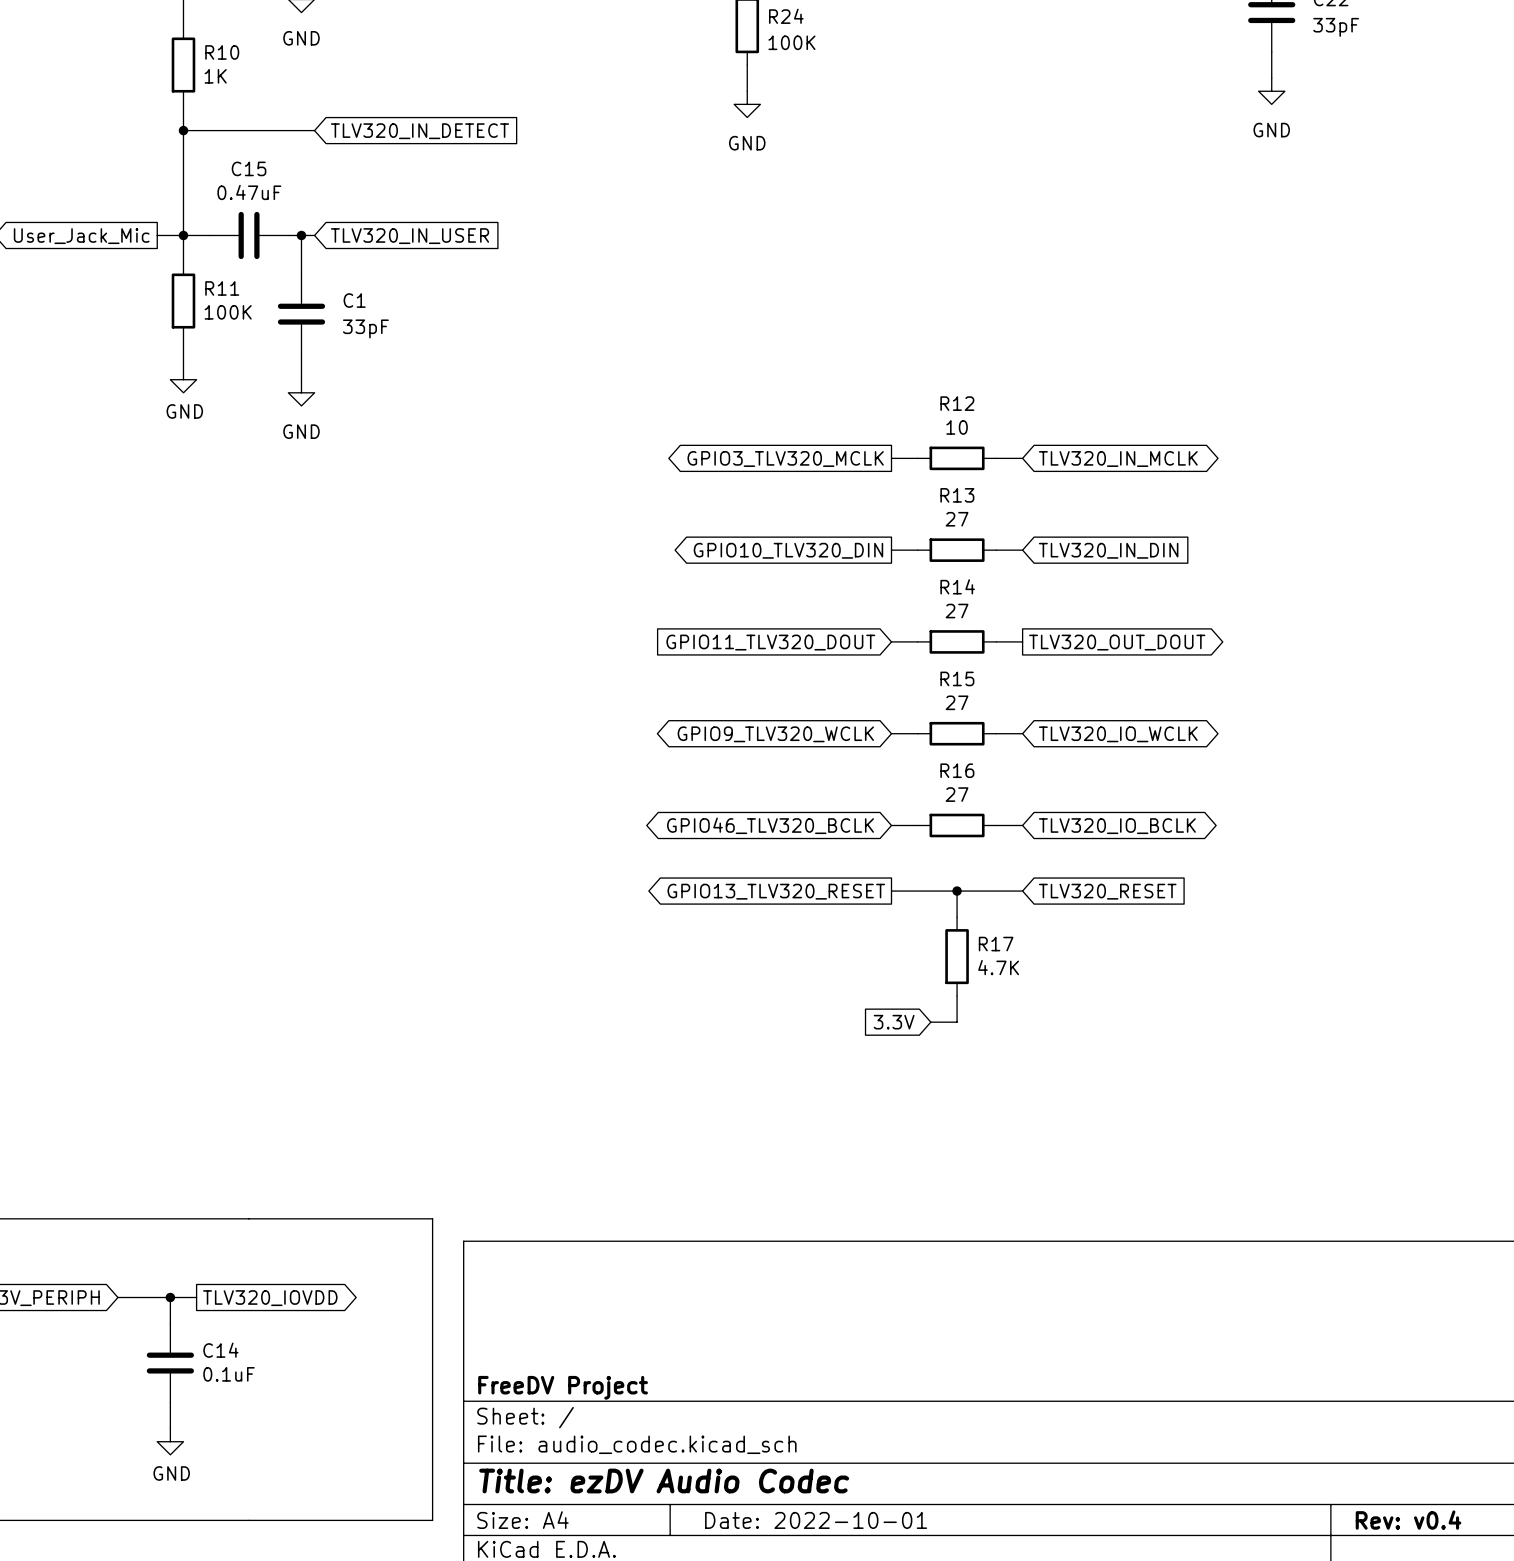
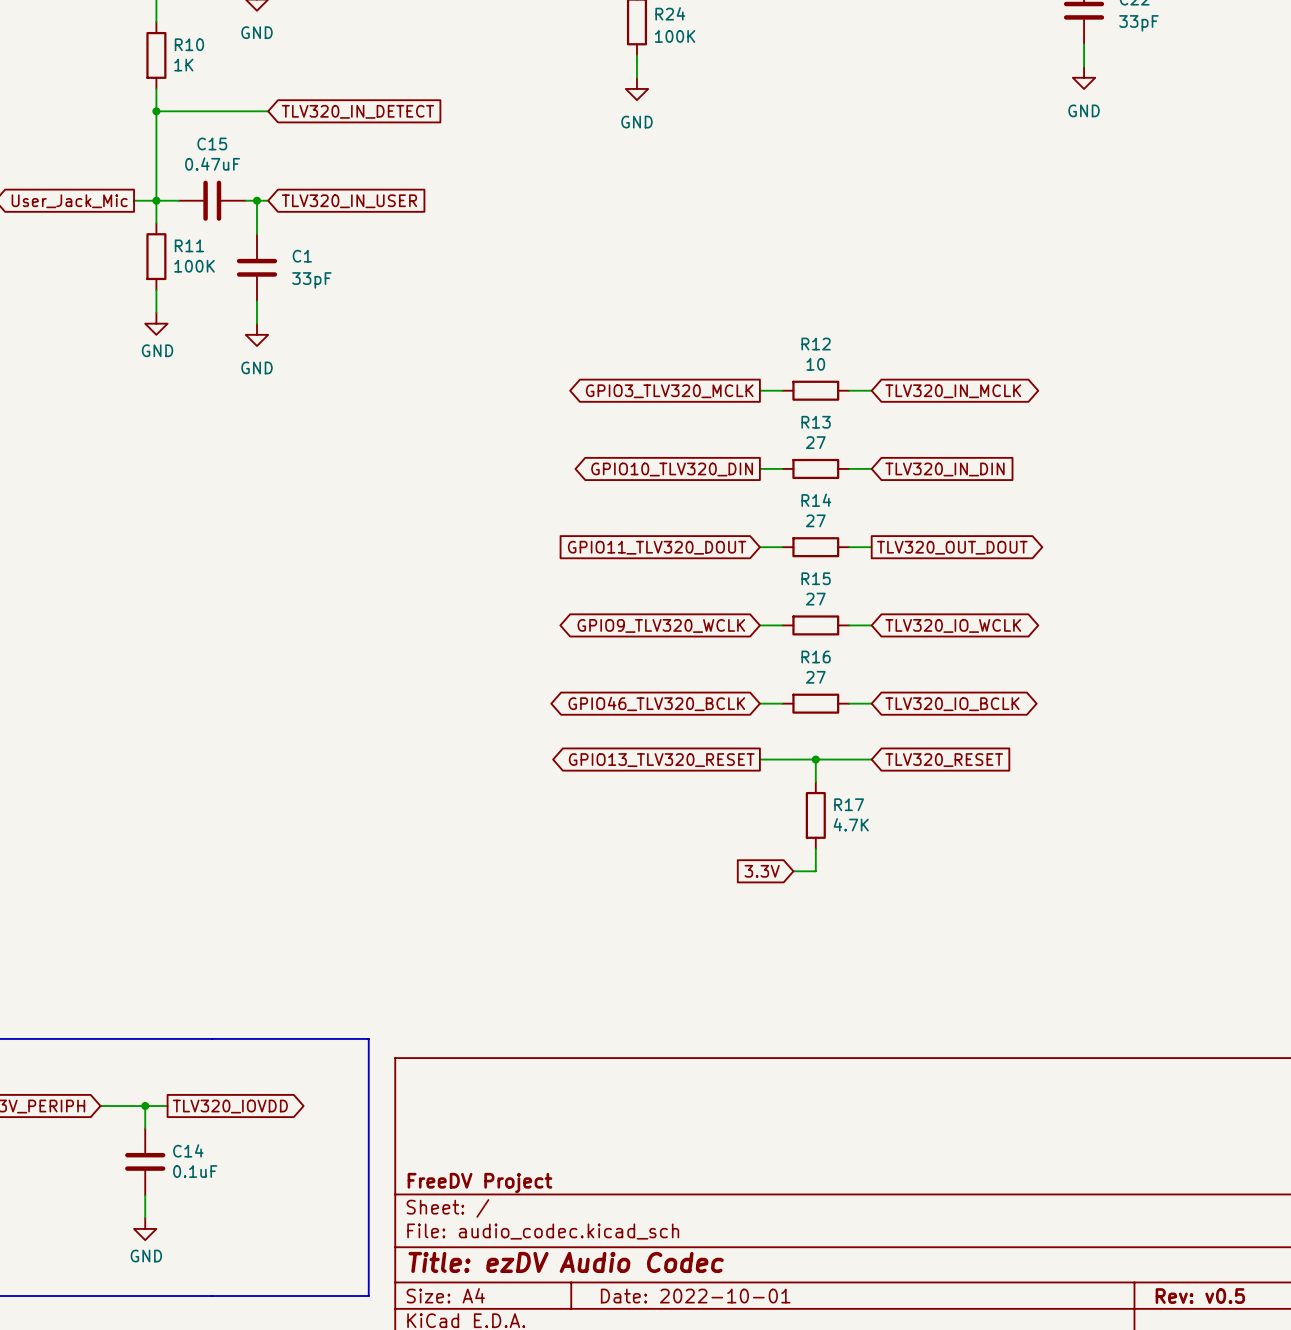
title block: Rev: v0.4 (1408, 1520) -> Rev: v0.5 (1200, 1296)

